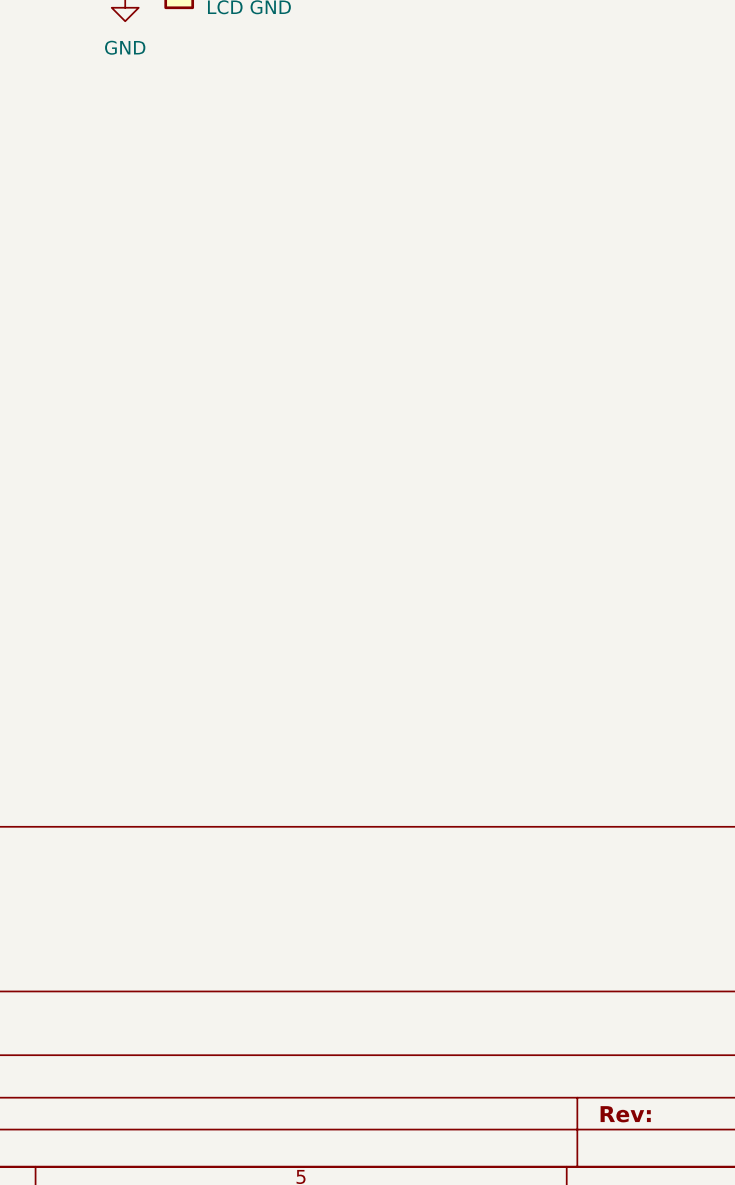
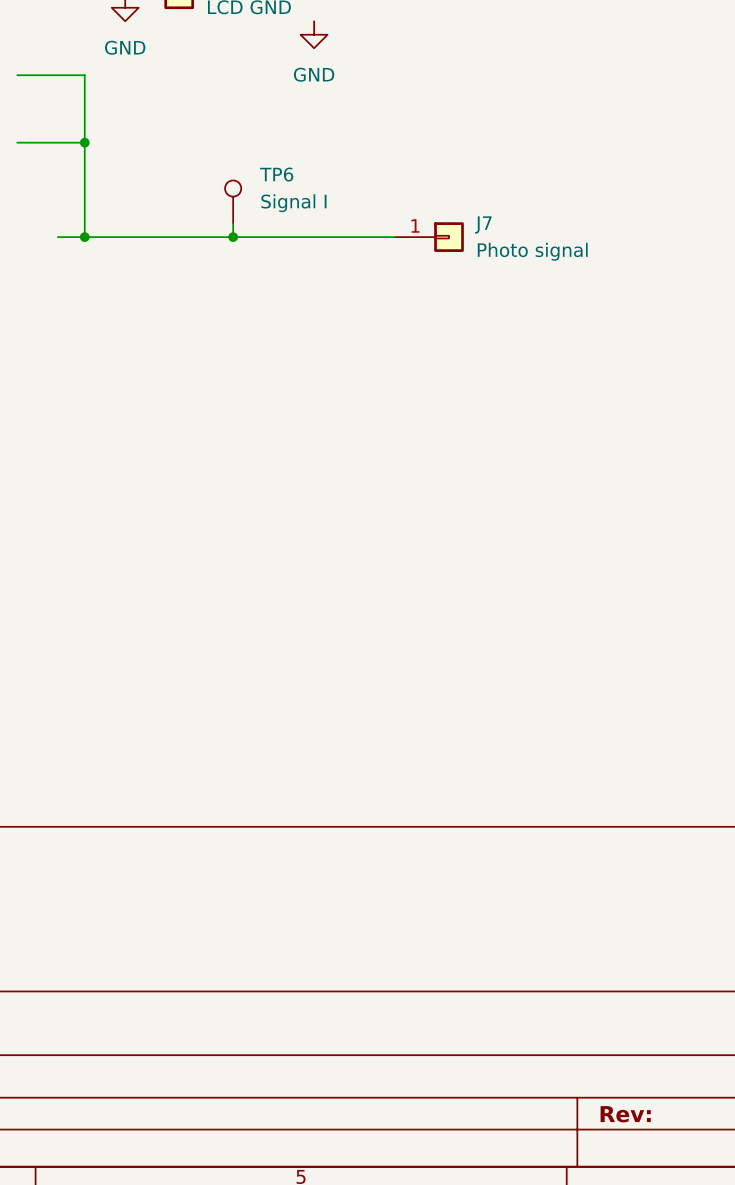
power symbol: none -> GND (314, 34)
wire: none -> (17, 75) (84, 75) (84, 237)
wire: none -> (17, 142) (84, 142)
junction: none -> (84, 142)
TP6: none -> Signal I (233, 202)
wire: none -> (233, 223) (233, 237)
wire: none -> (57, 237) (395, 237)
junction: none -> (84, 237)
junction: none -> (233, 237)
J7: none -> Photo signal (429, 237)

